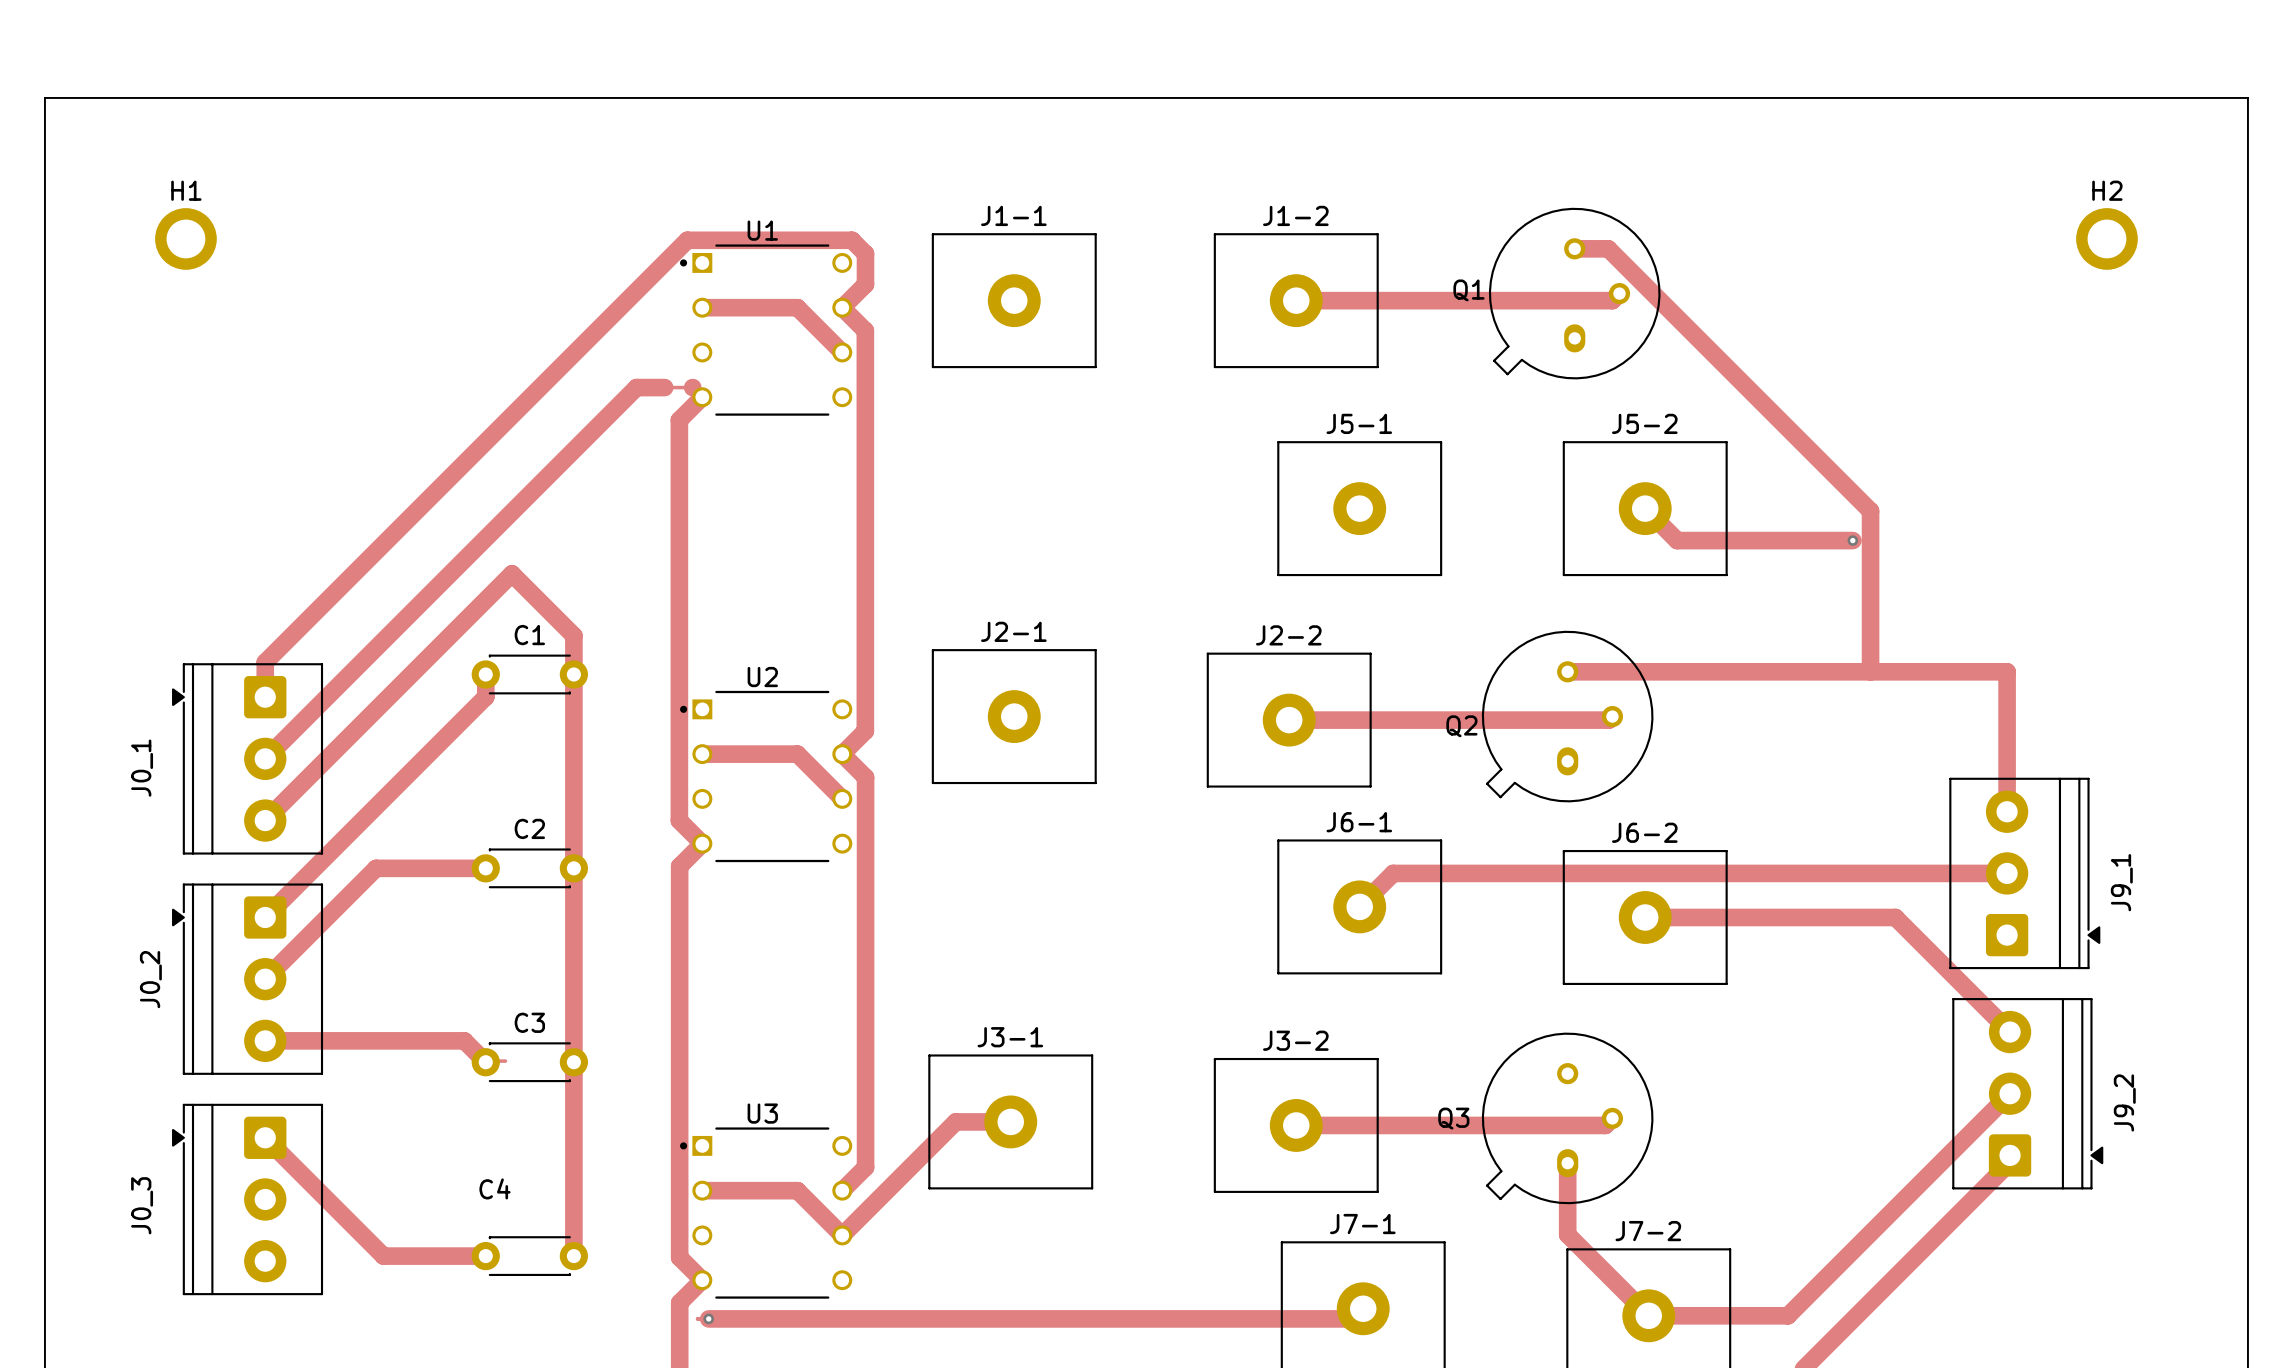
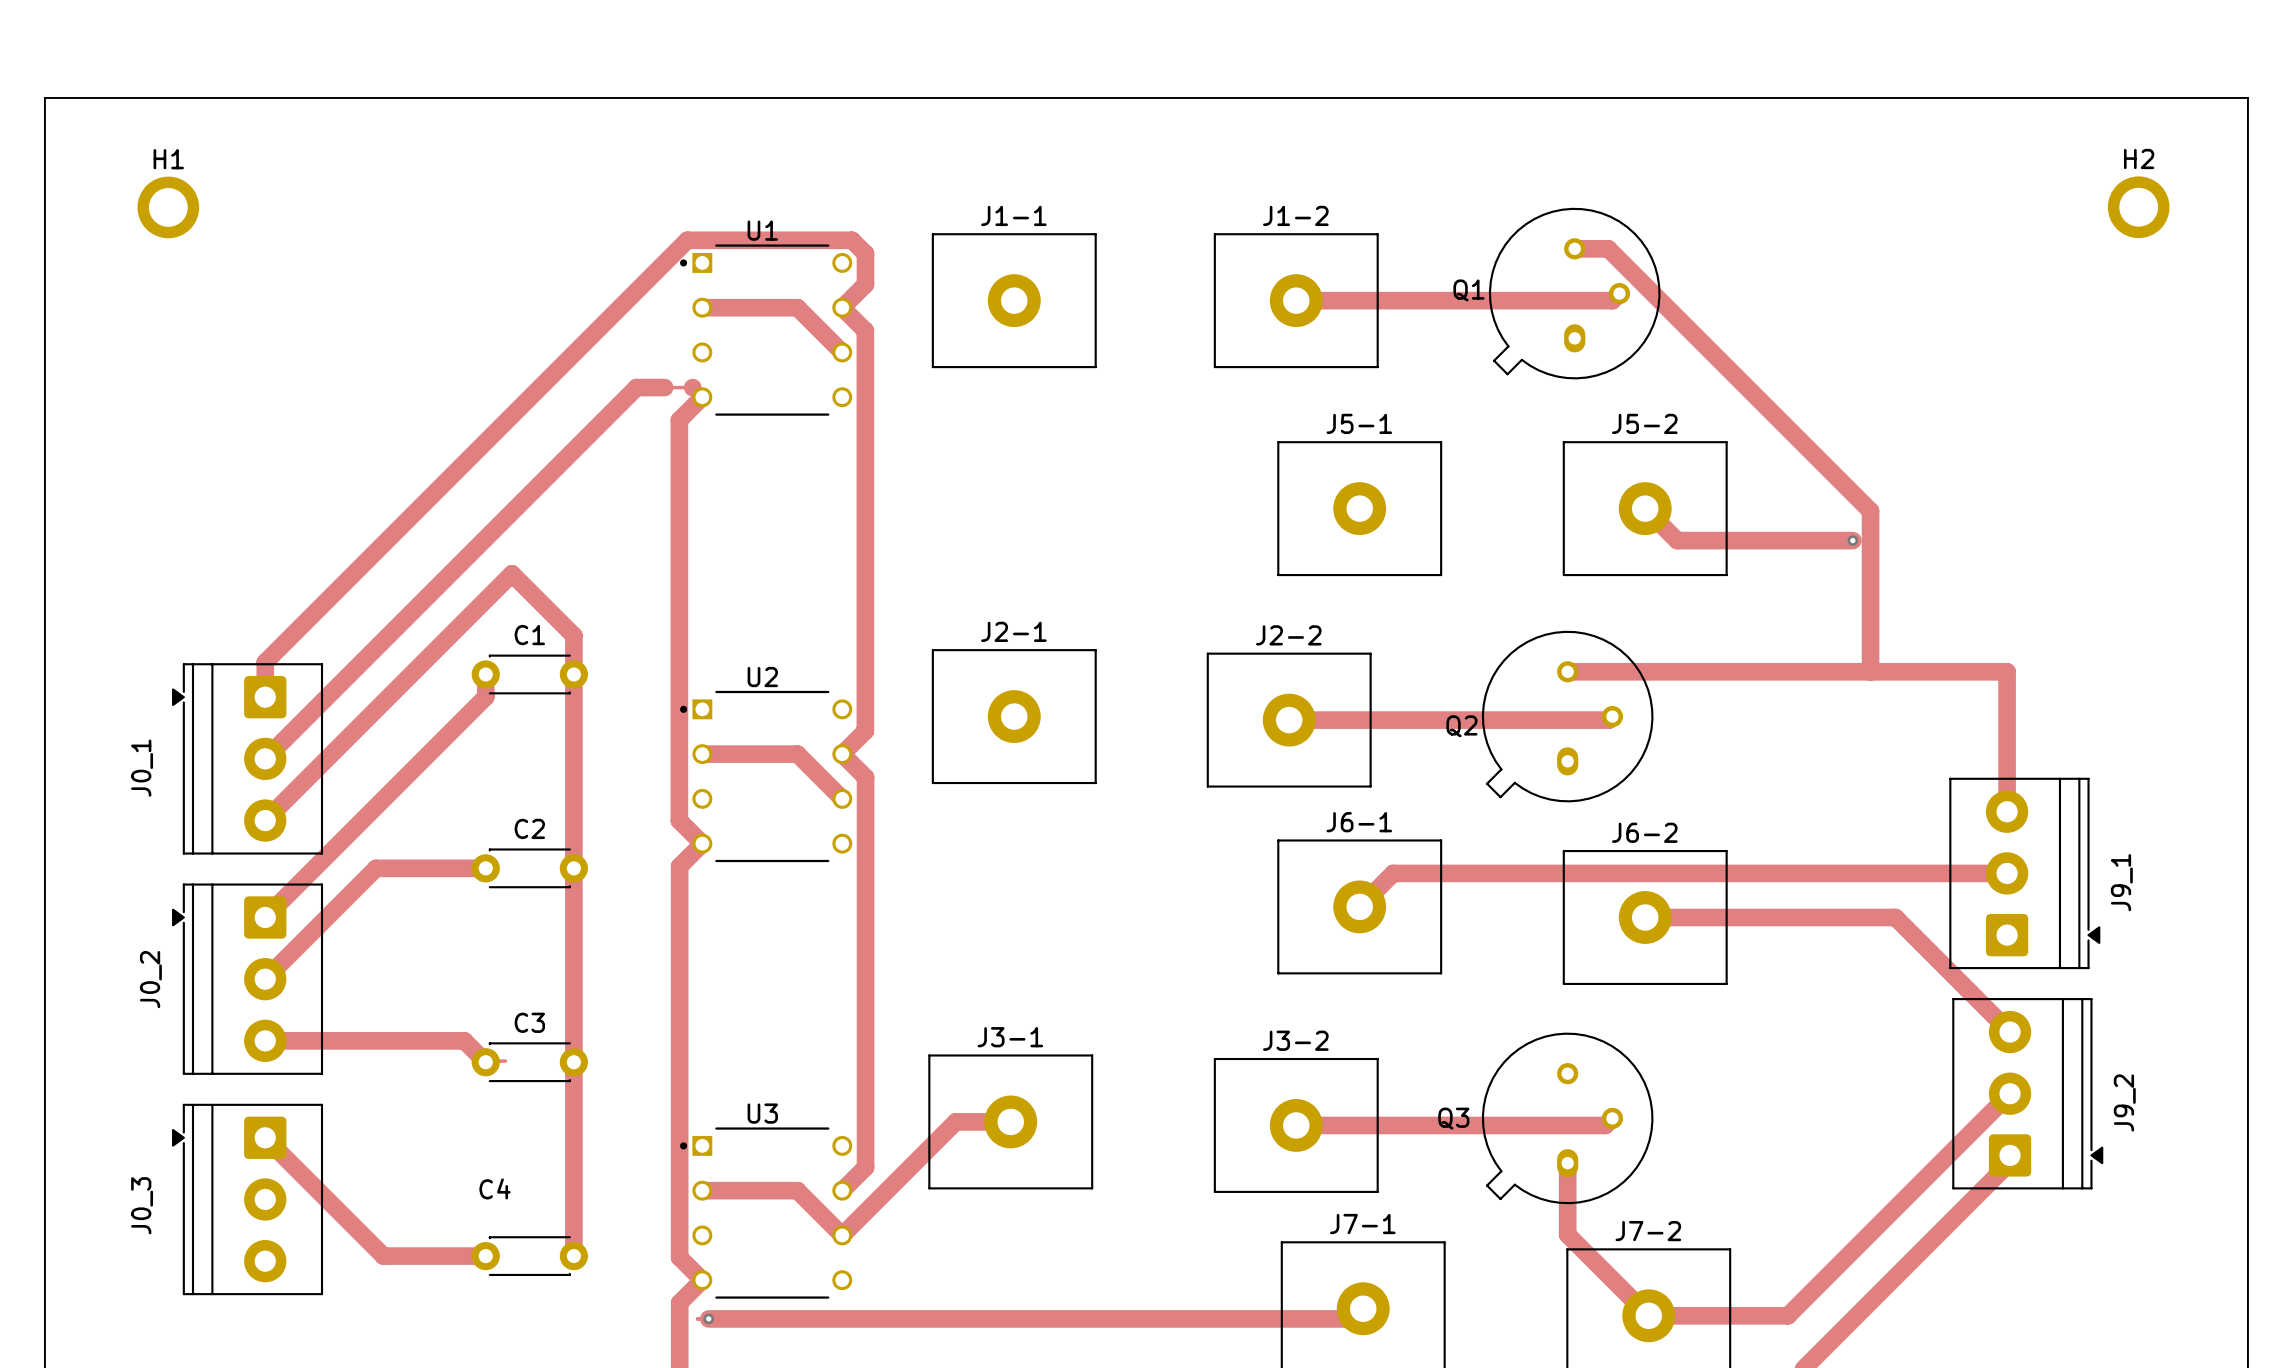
H1 position: (185, 238) -> (168, 207)
H2 position: (2106, 238) -> (2138, 207)

